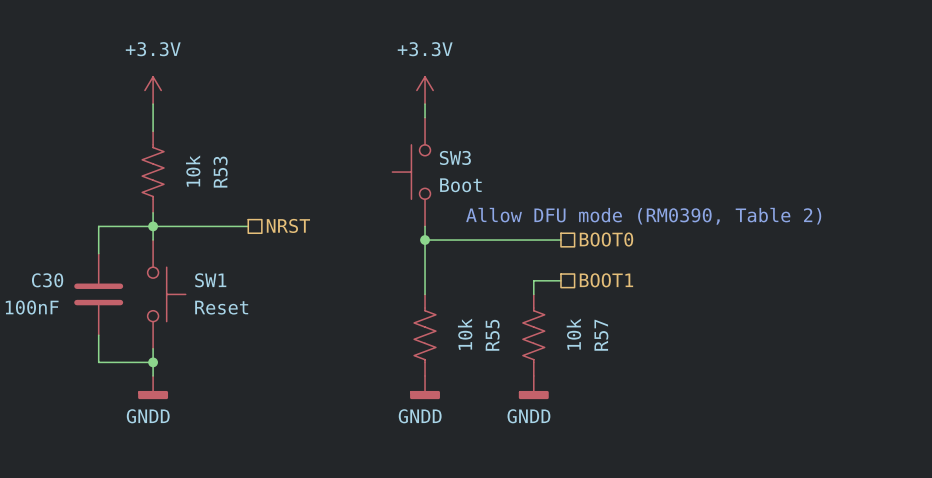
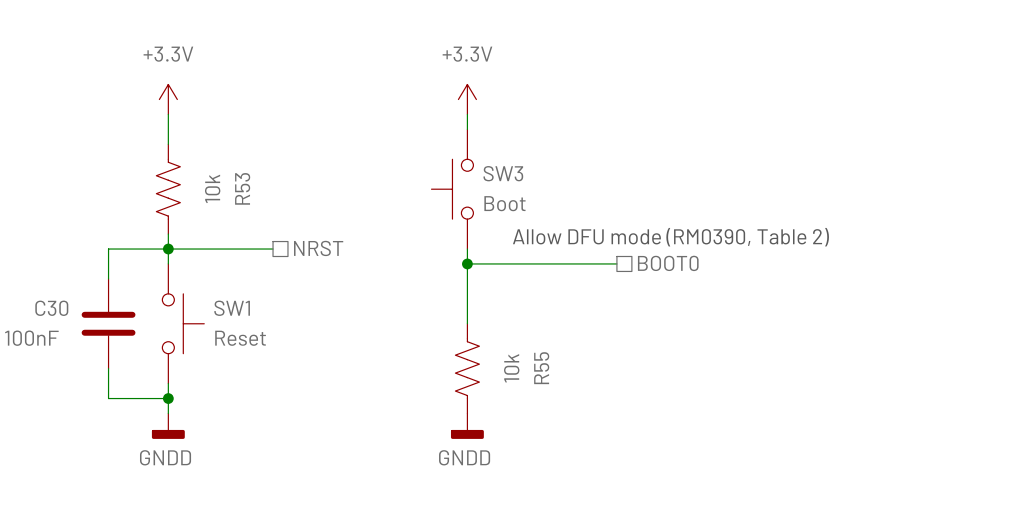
wire: (560, 280) (533, 280) (533, 294) -> none
hierarchical label: BOOT1 (606, 280) -> none
R57: 10k (533, 335) -> none
power symbol: GNDD (533, 387) -> none

